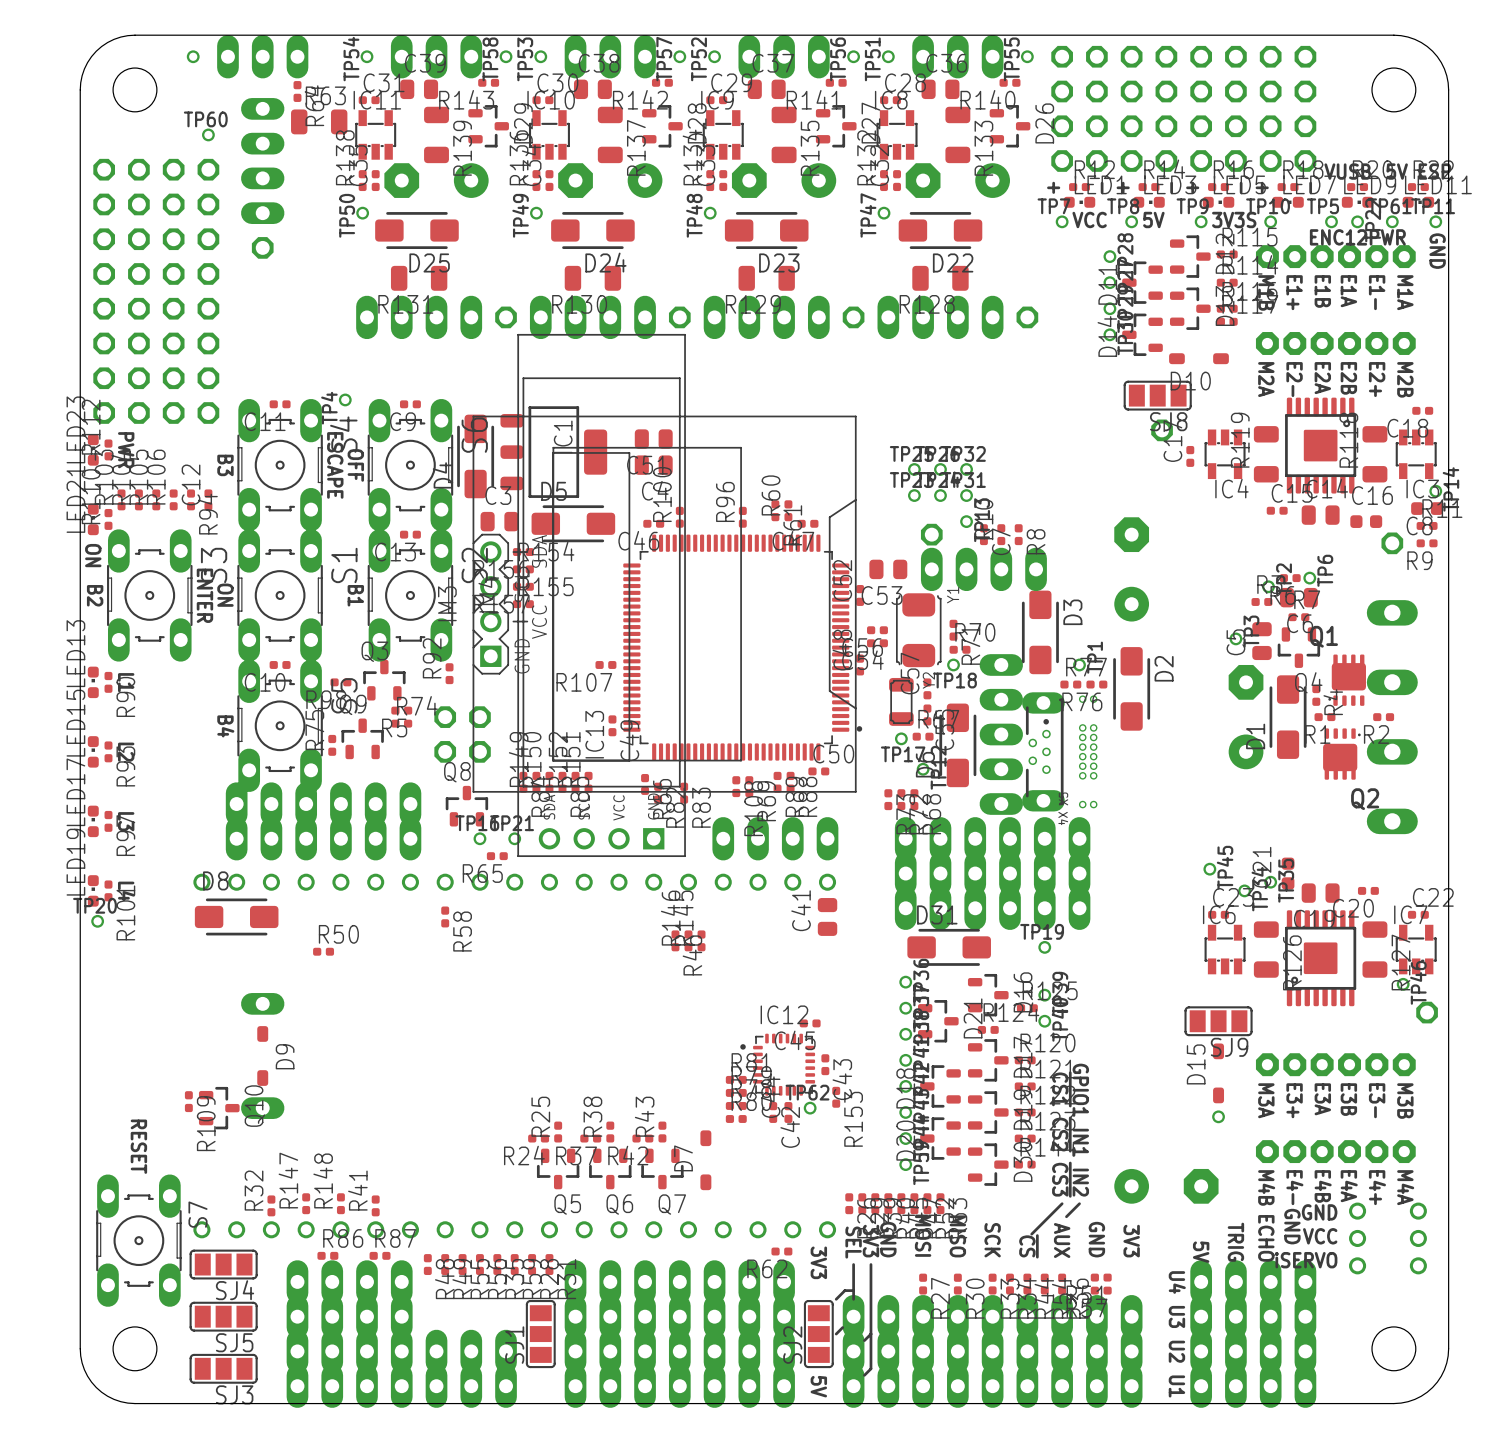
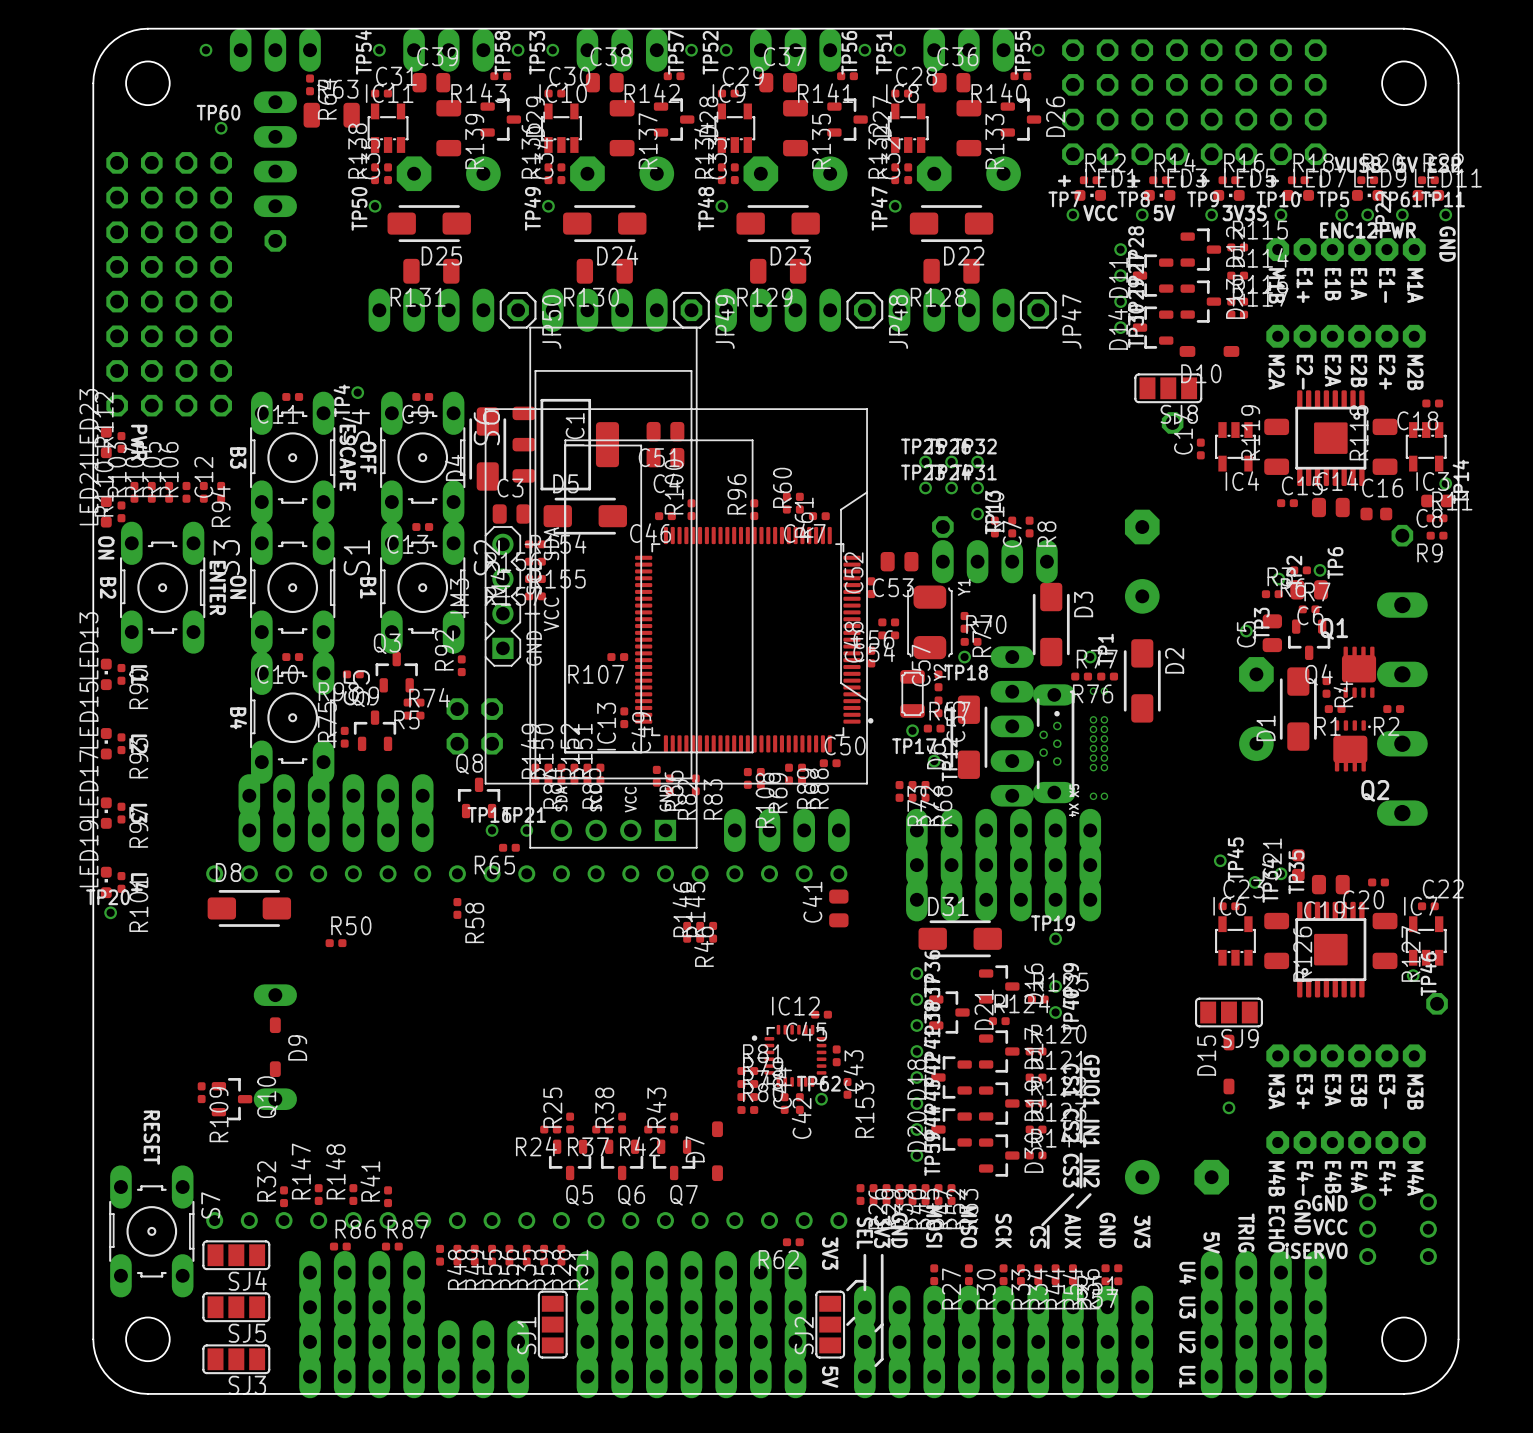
JP50 side: bottom (506, 317) -> top (518, 310)
JP49 side: bottom (679, 317) -> top (691, 310)
JP48 side: bottom (853, 317) -> top (864, 310)
JP47 side: bottom (1027, 317) -> top (1038, 310)

